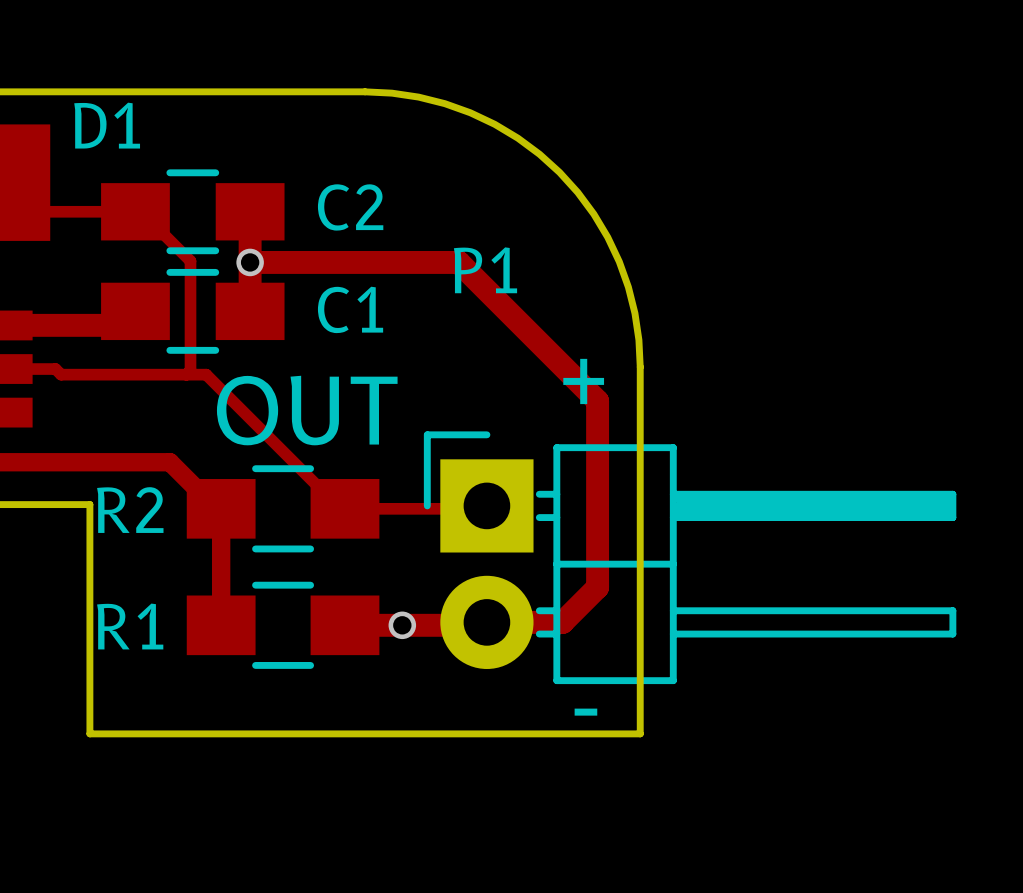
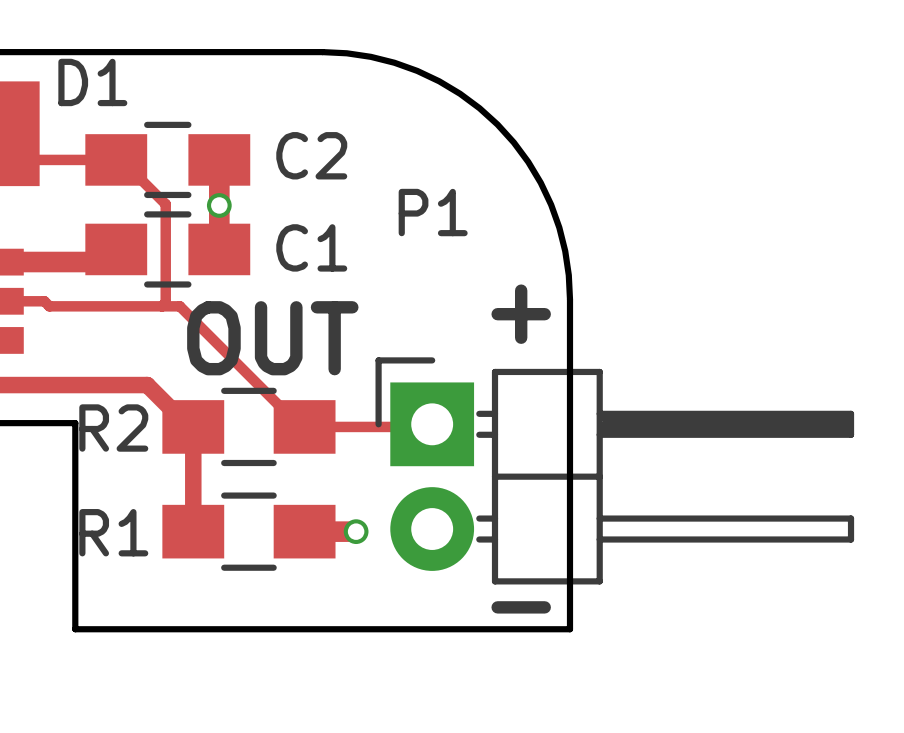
track: (250, 262) (458, 262) (597, 401) (597, 587) (562, 622) (402, 625) -> none

